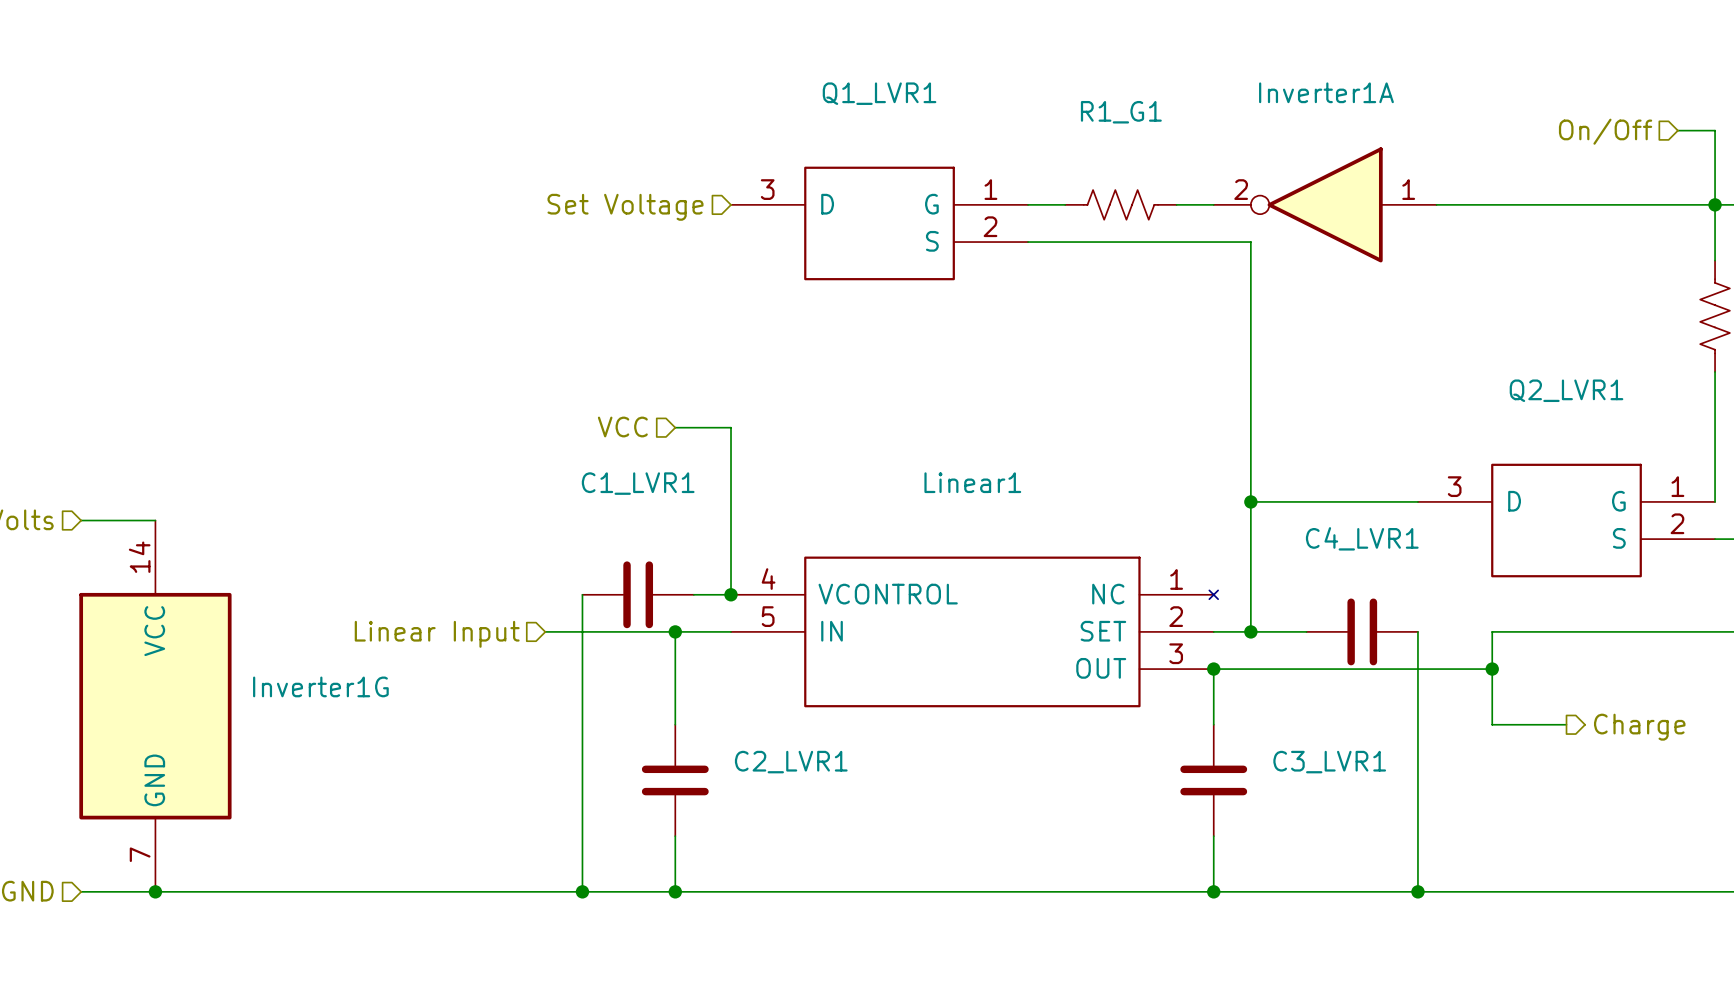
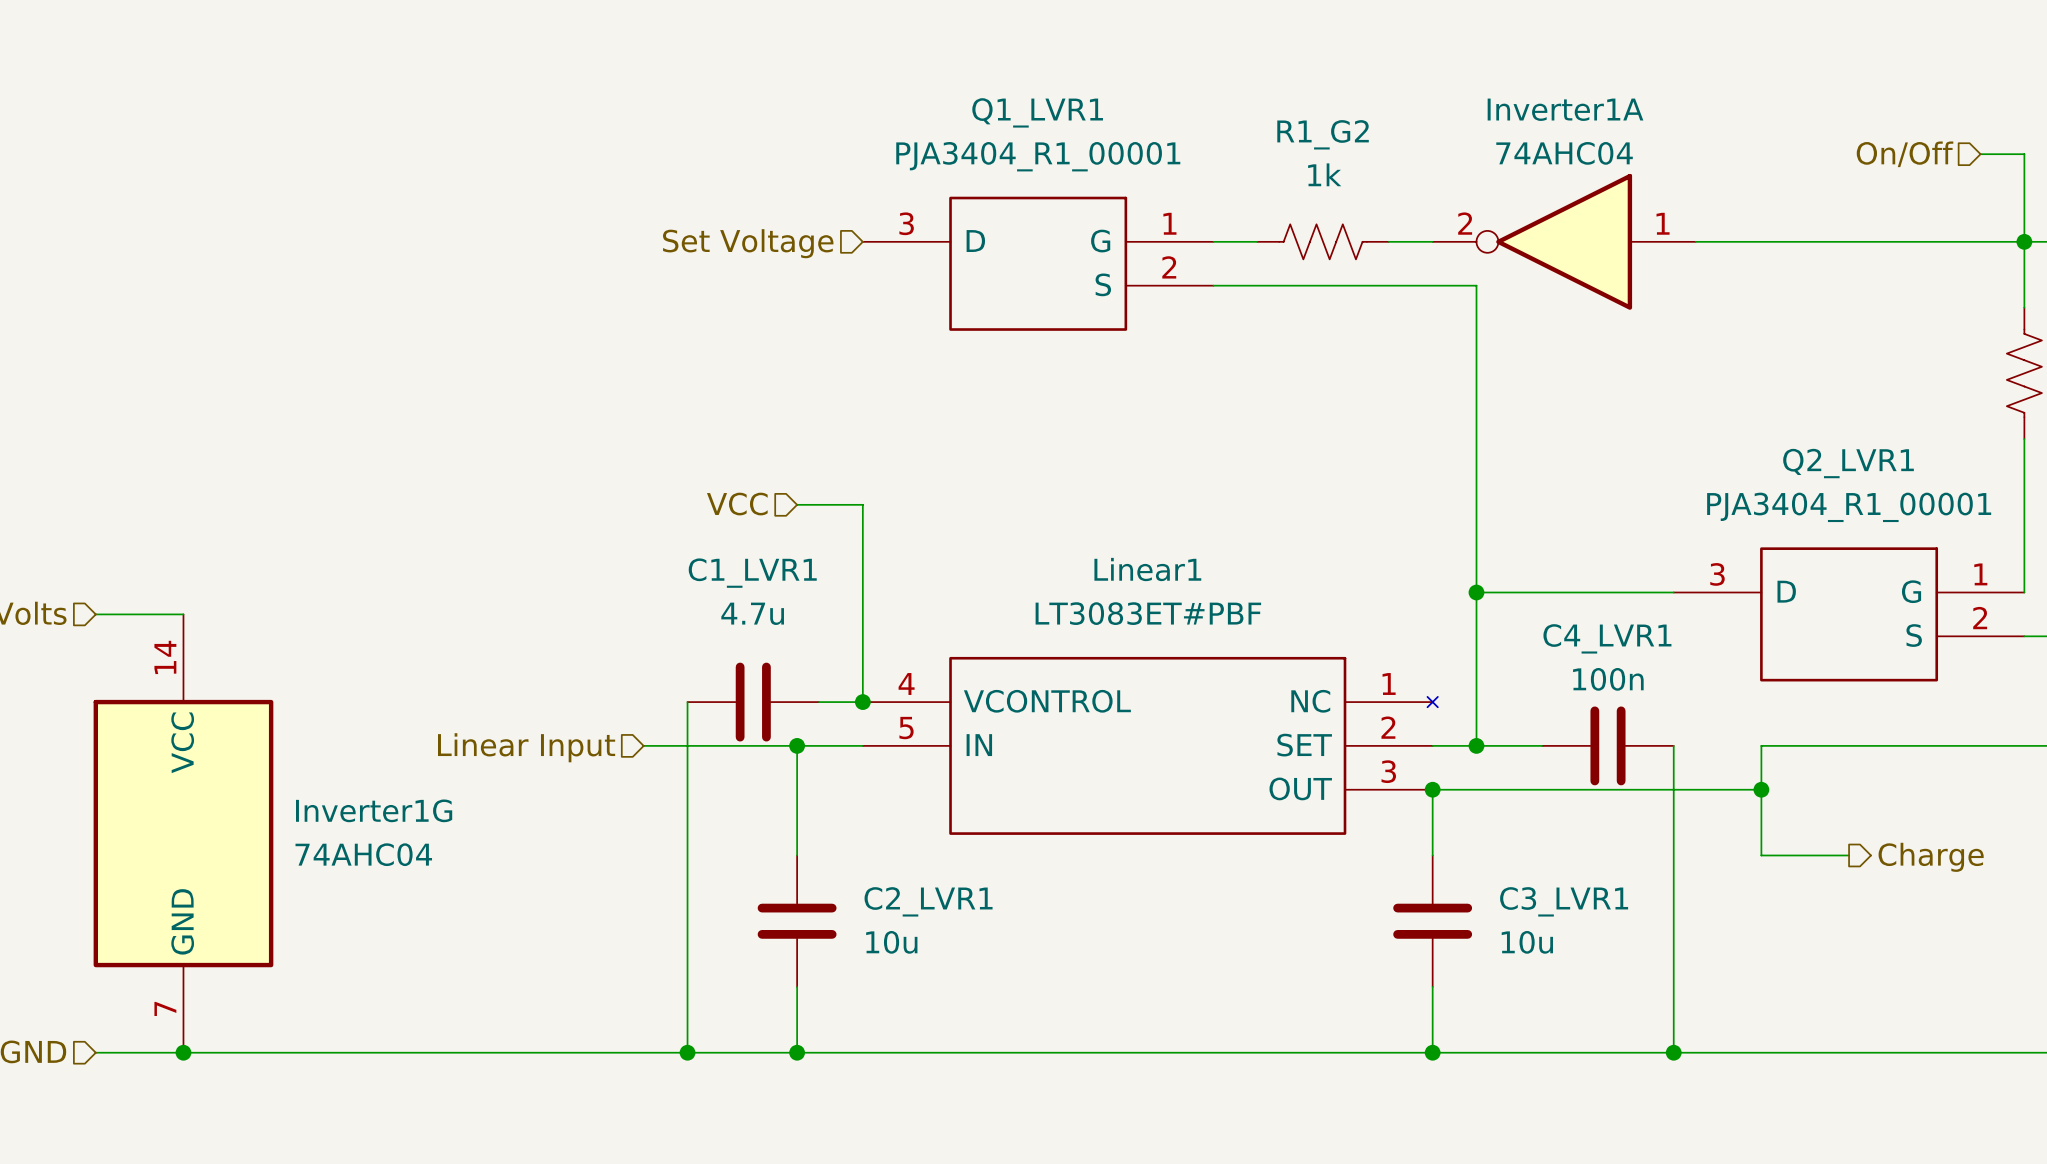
R1_G1 name: R1_G1 (1121, 112) -> R1_G2 (1323, 134)
Inverter1A value: none -> 74AHC04 (1564, 153)
Q1_LVR1 value: none -> PJA3404_R1_00001 (1038, 156)
R1_G1 value: none -> 1k (1324, 174)
Q2_LVR1 value: none -> PJA3404_R1_00001 (1849, 507)
C1_LVR1 value: none -> 4.7u (752, 613)
Linear1 value: none -> LT3083ET#PBF (1148, 613)
C4_LVR1 value: none -> 100n (1608, 679)
Inverter1G value: none -> 74AHC04 (363, 854)
C2_LVR1 value: none -> 10u (891, 942)
C3_LVR1 value: none -> 10u (1527, 942)

